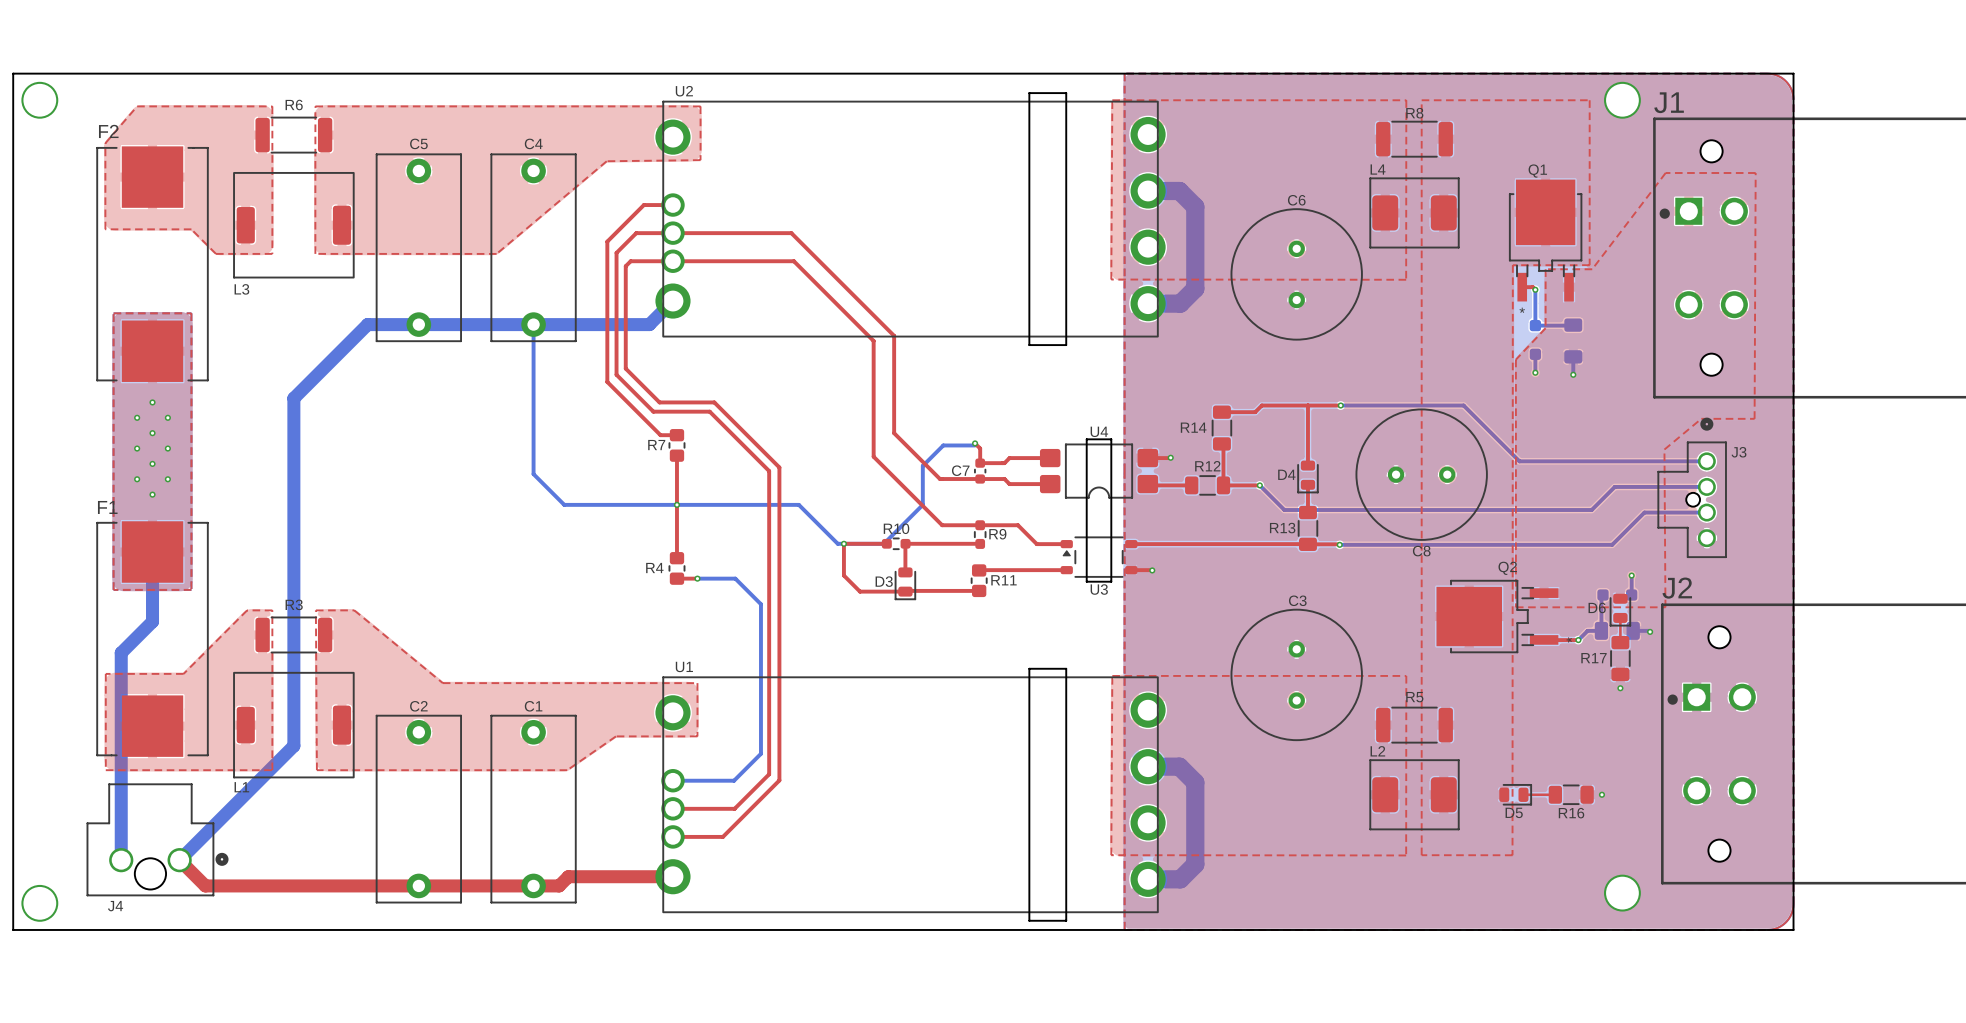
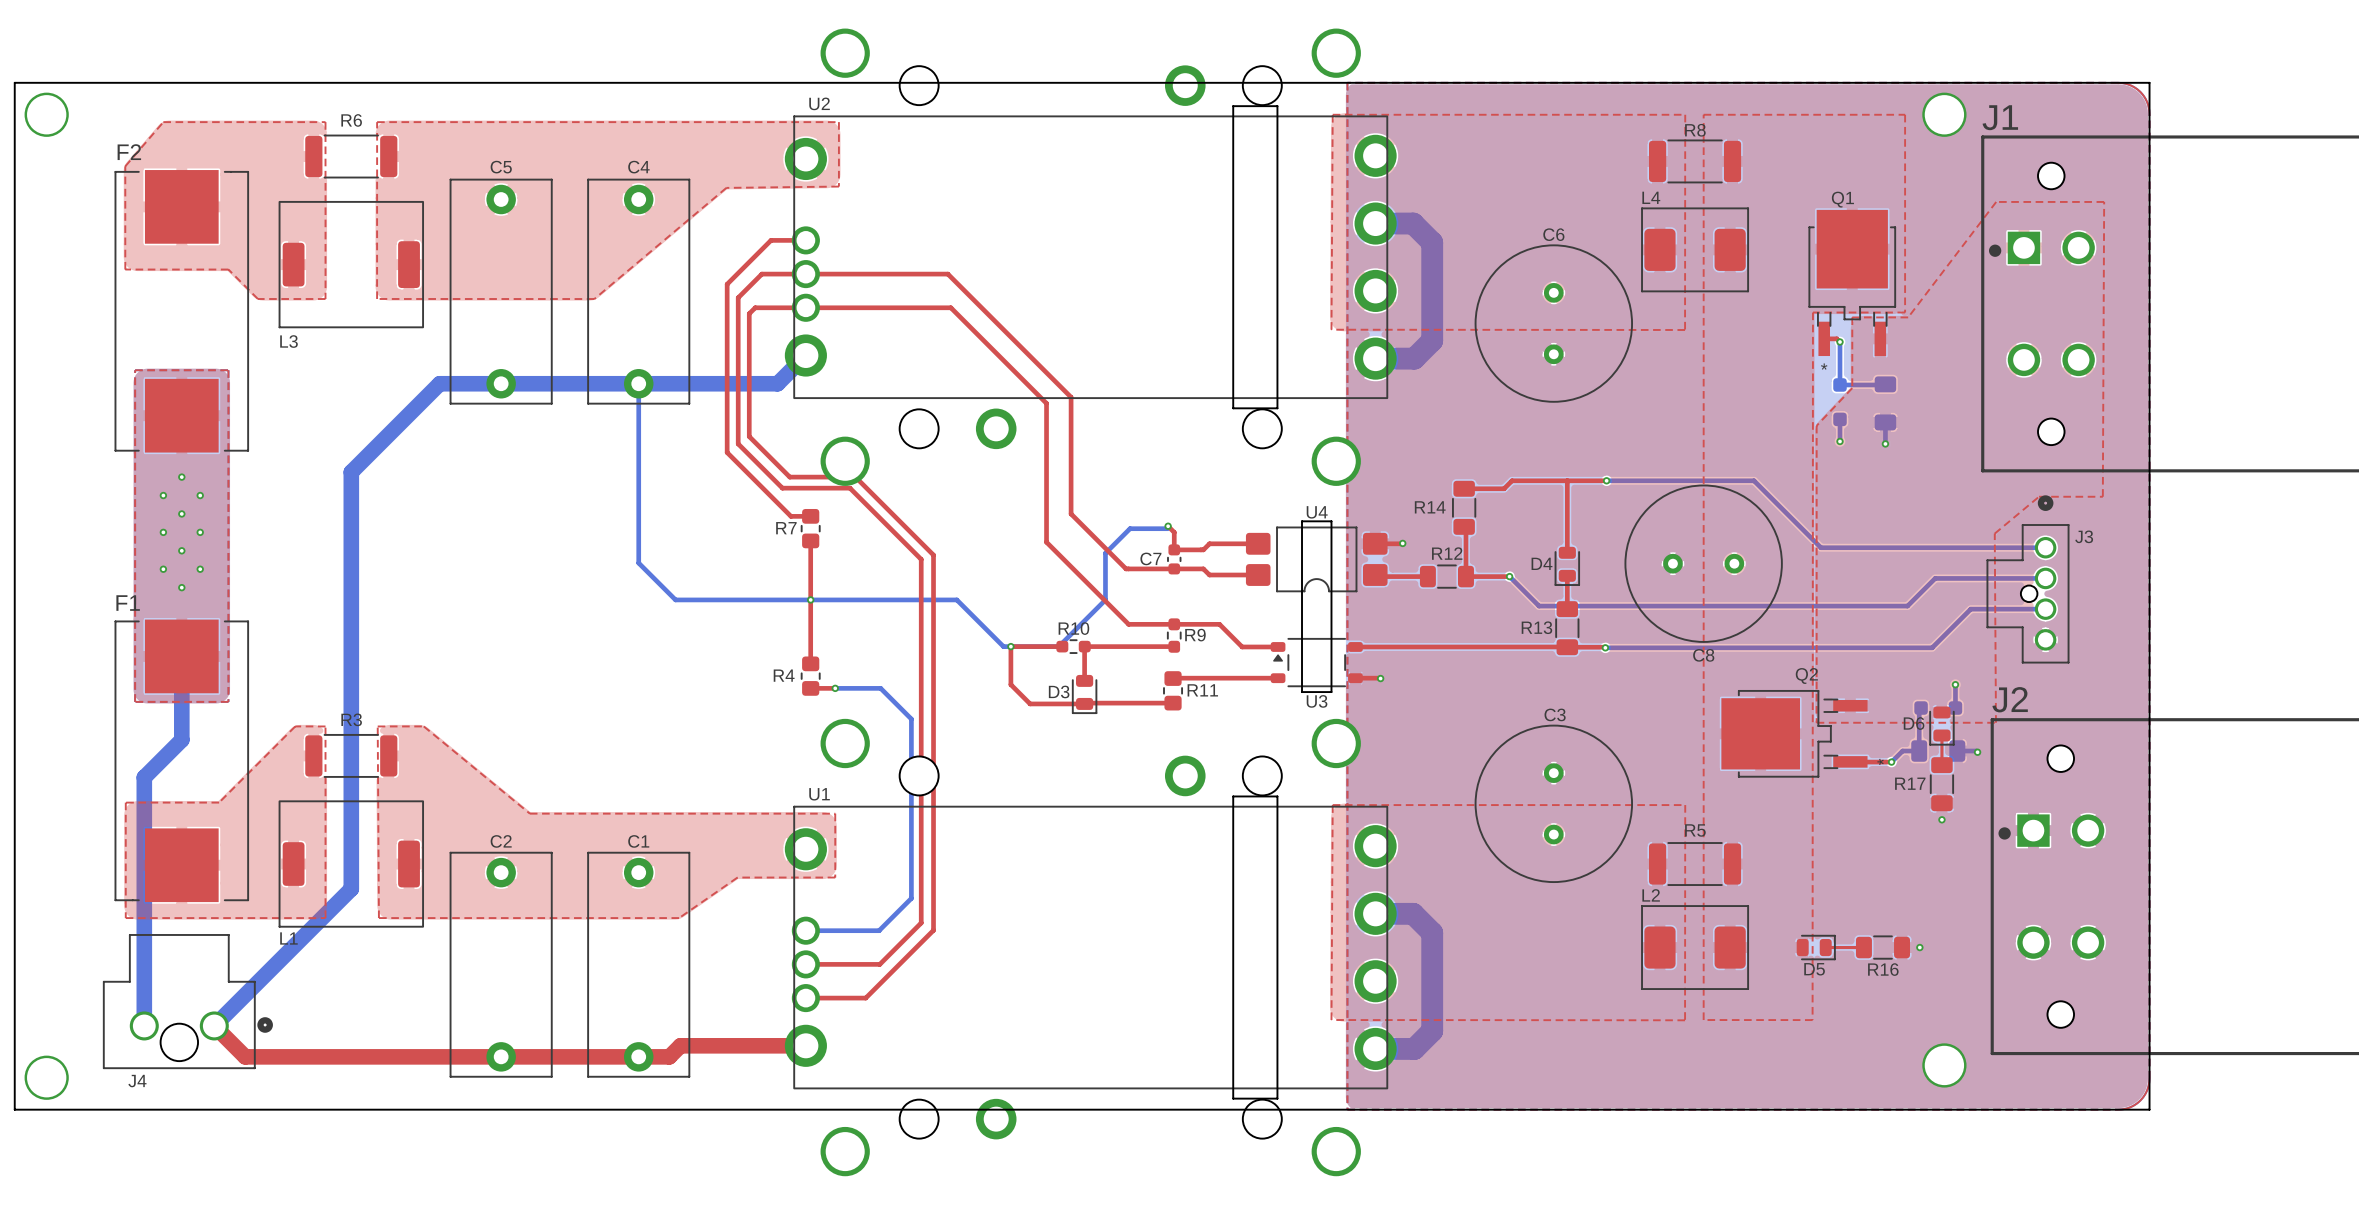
U2 footprint: [655, 101, 1166, 338] -> [784, 28, 1397, 486]
U1 footprint: [655, 676, 1166, 913] -> [784, 718, 1397, 1177]

